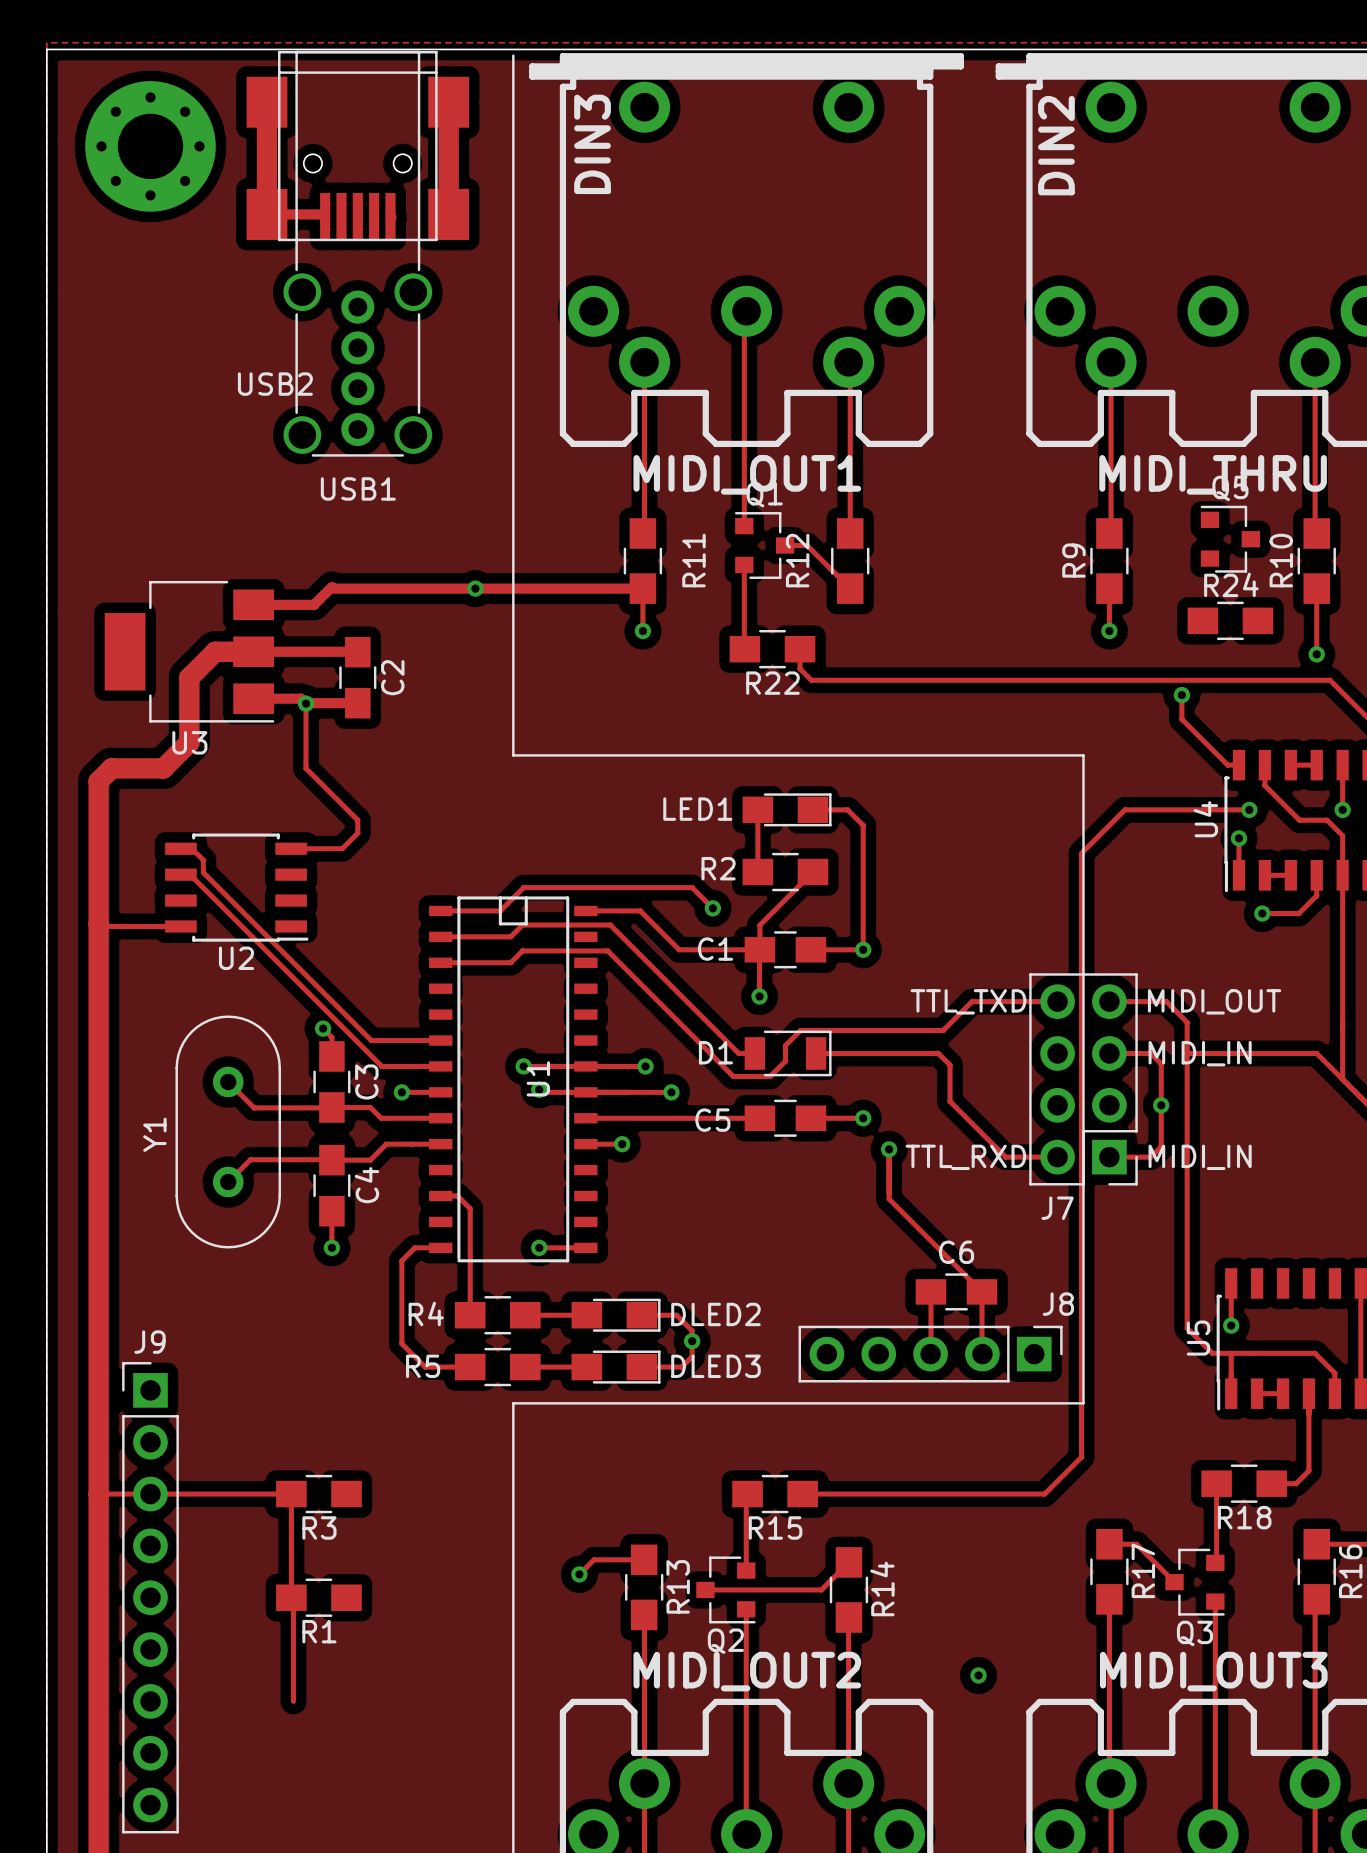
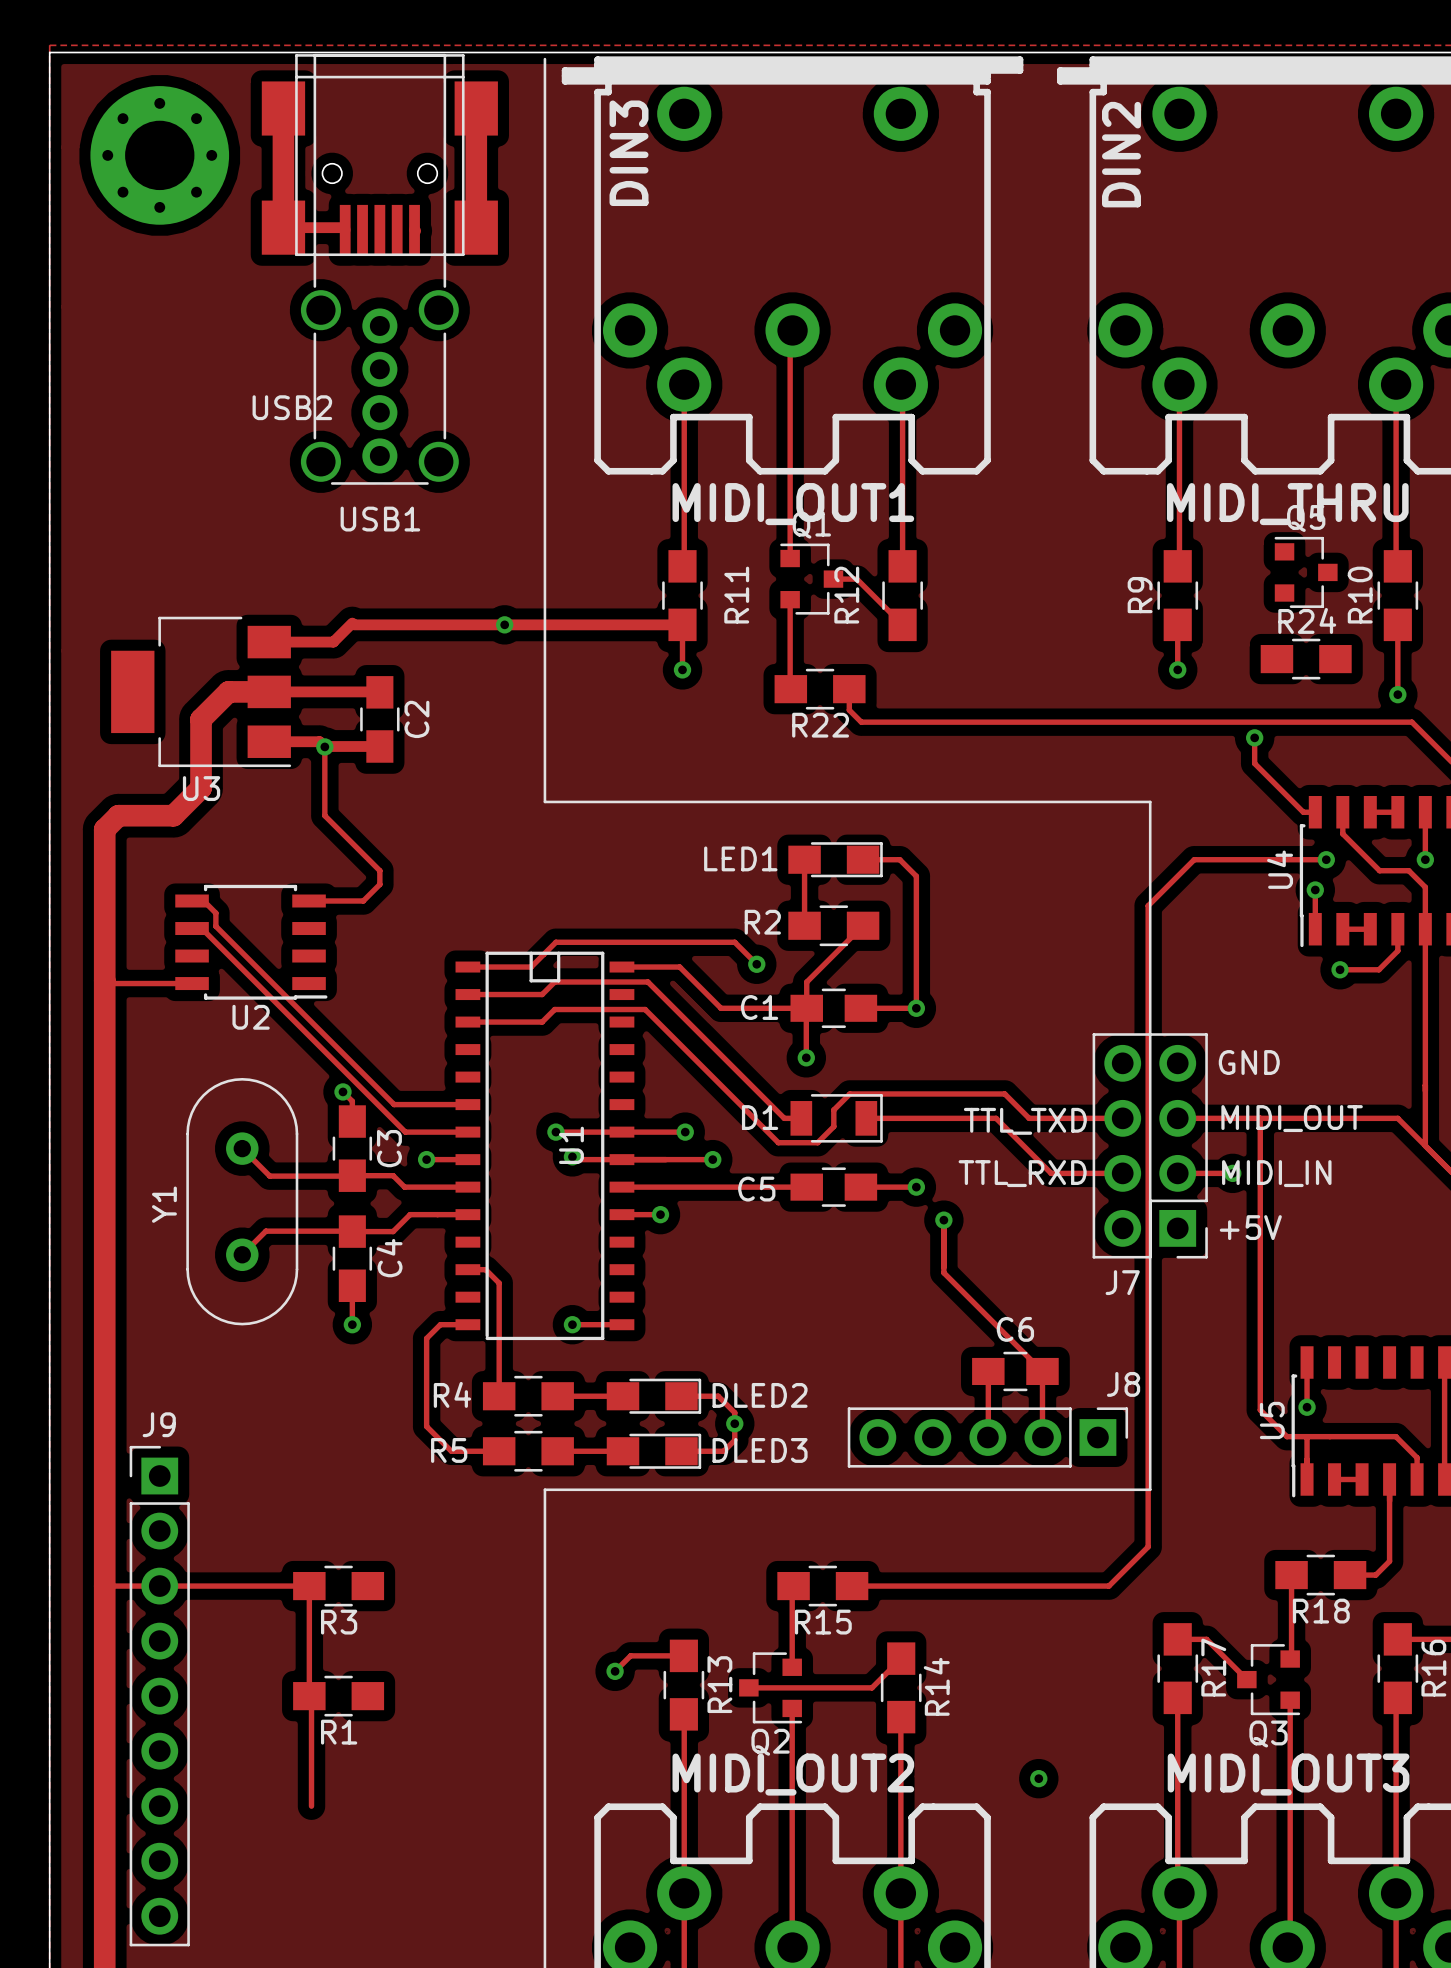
text: none -> GND (1249, 1062)
text position: TTL_TXD (968, 1001) -> TTL_TXD (1025, 1121)
track: (1057, 1001) (972, 1001) (943, 1030) -> (1122, 1118) (1029, 1118) (1004, 1093) (1001, 1093)
track: (1109, 1001) (1166, 1001) (1187, 1022) (1187, 1053) -> (1221, 1118) (1260, 1118)
text: MIDI_OUT (1214, 1001) -> none
track: (1150, 1053) (1161, 1063) (1161, 1146) (1150, 1157) (1109, 1157) -> none
text: MIDI_IN (1200, 1053) -> MIDI_OUT (1292, 1118)
track: (950, 1065) (950, 1101) (1005, 1157) (1057, 1157) -> (1008, 1130) (1051, 1173) (1122, 1173)
track: none -> (1177, 1173) (1232, 1173)
text: none -> +5V (1250, 1227)
text position: TTL_RXD (965, 1157) -> TTL_RXD (1022, 1173)
text position: MIDI_IN (1200, 1157) -> MIDI_IN (1276, 1173)

